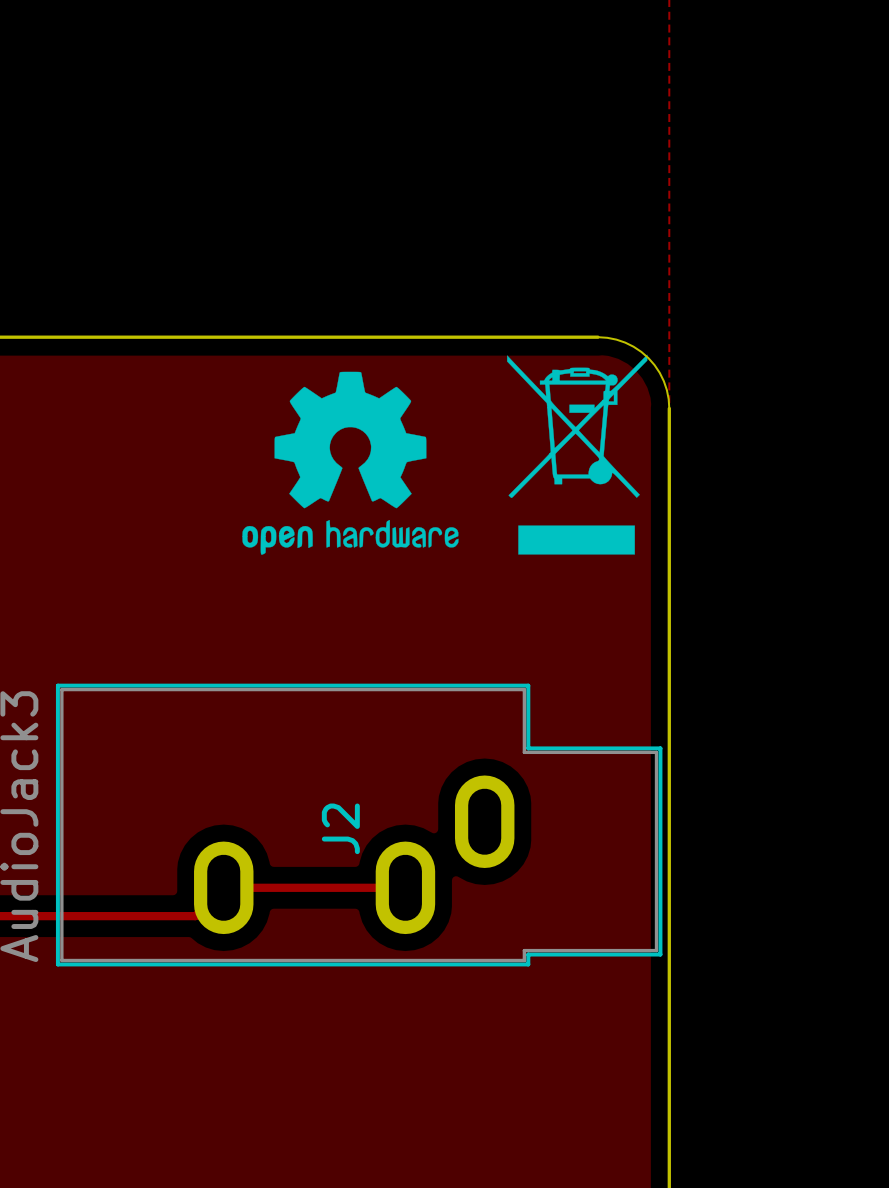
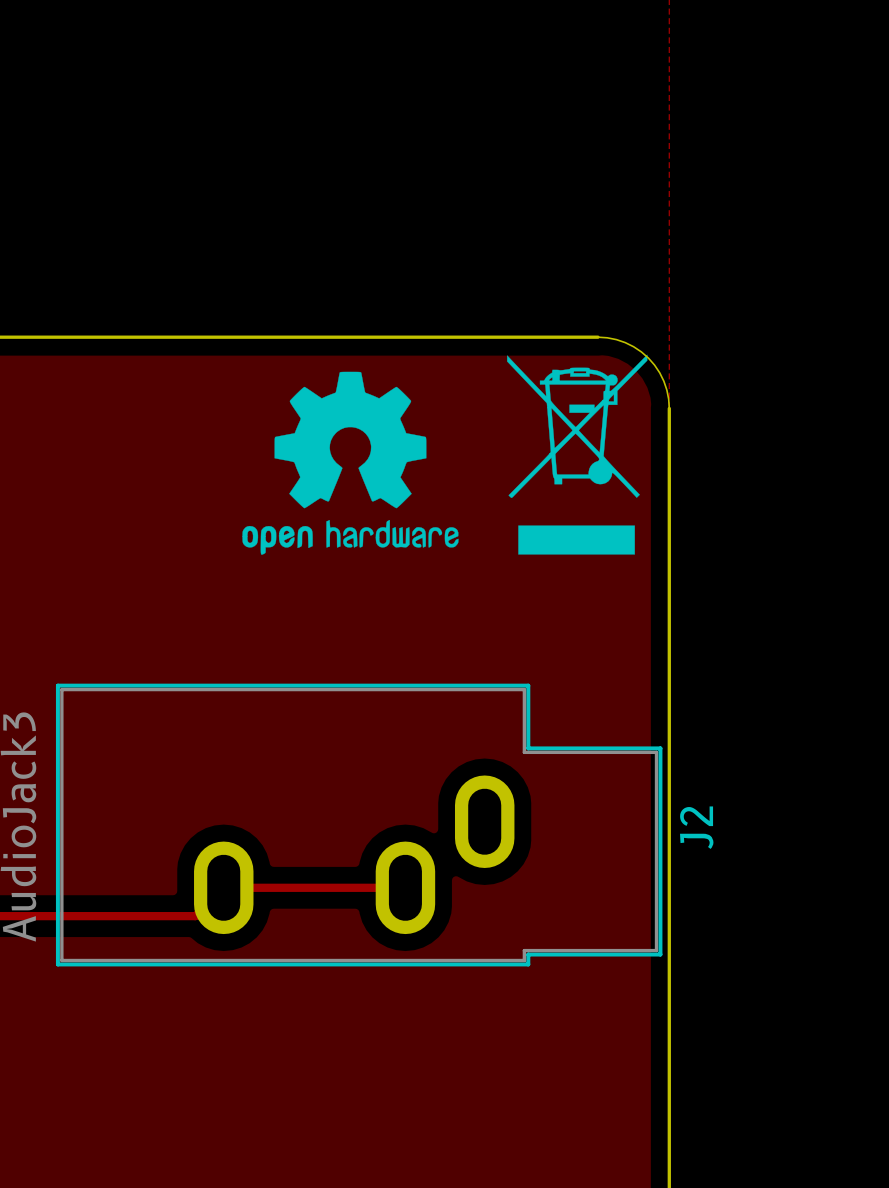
J2 name position: J2 (340, 828) -> J2 (696, 827)

